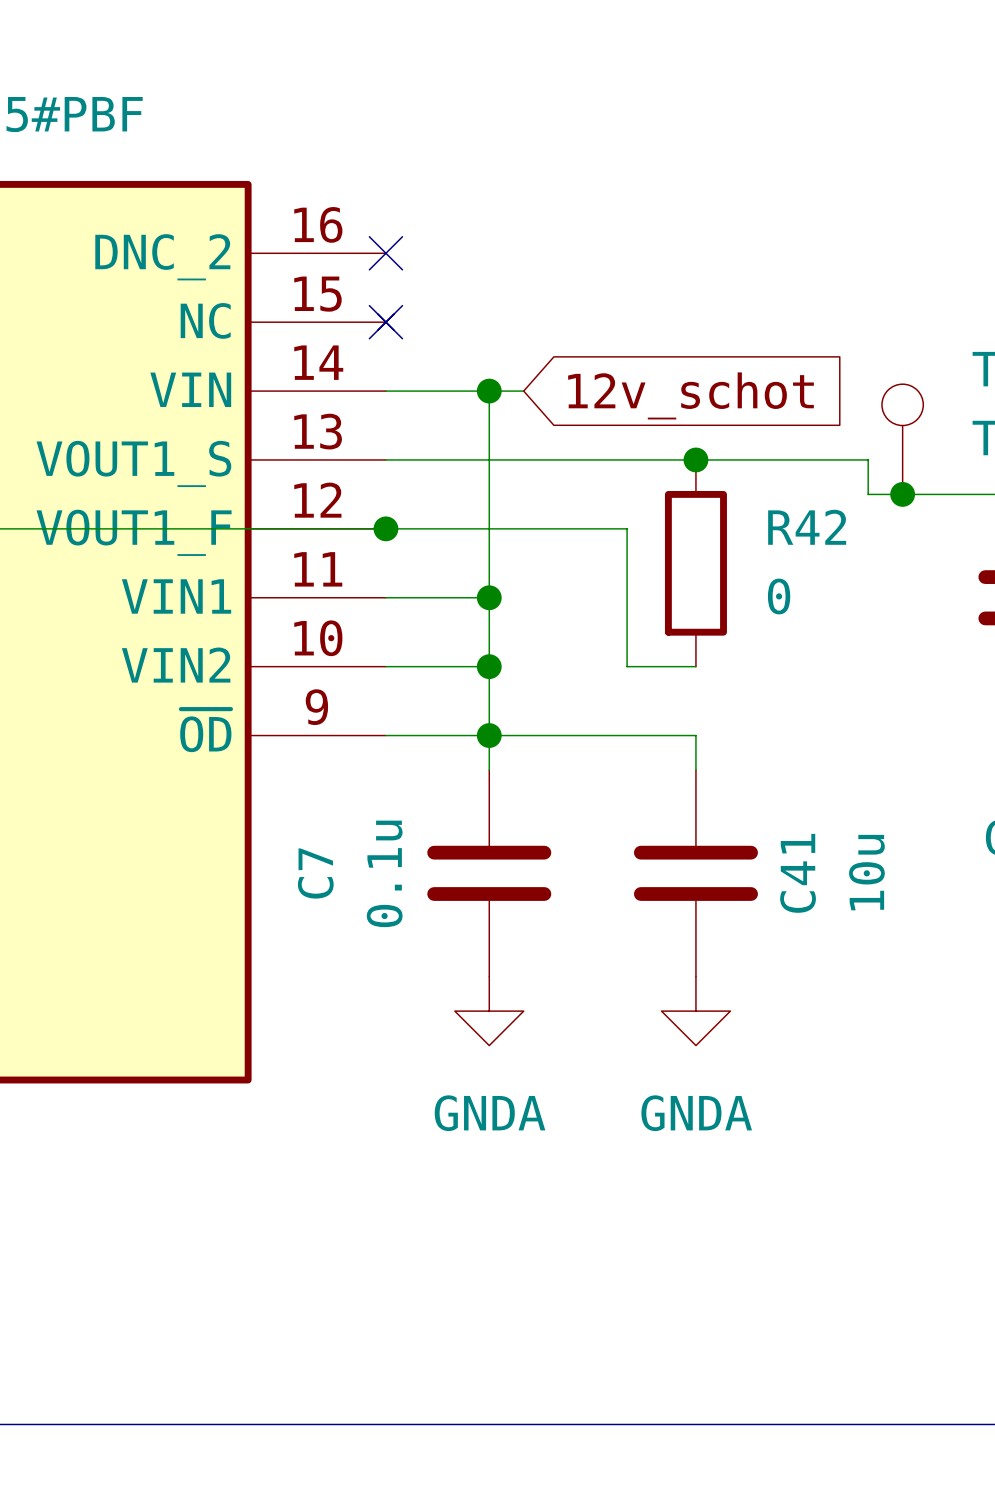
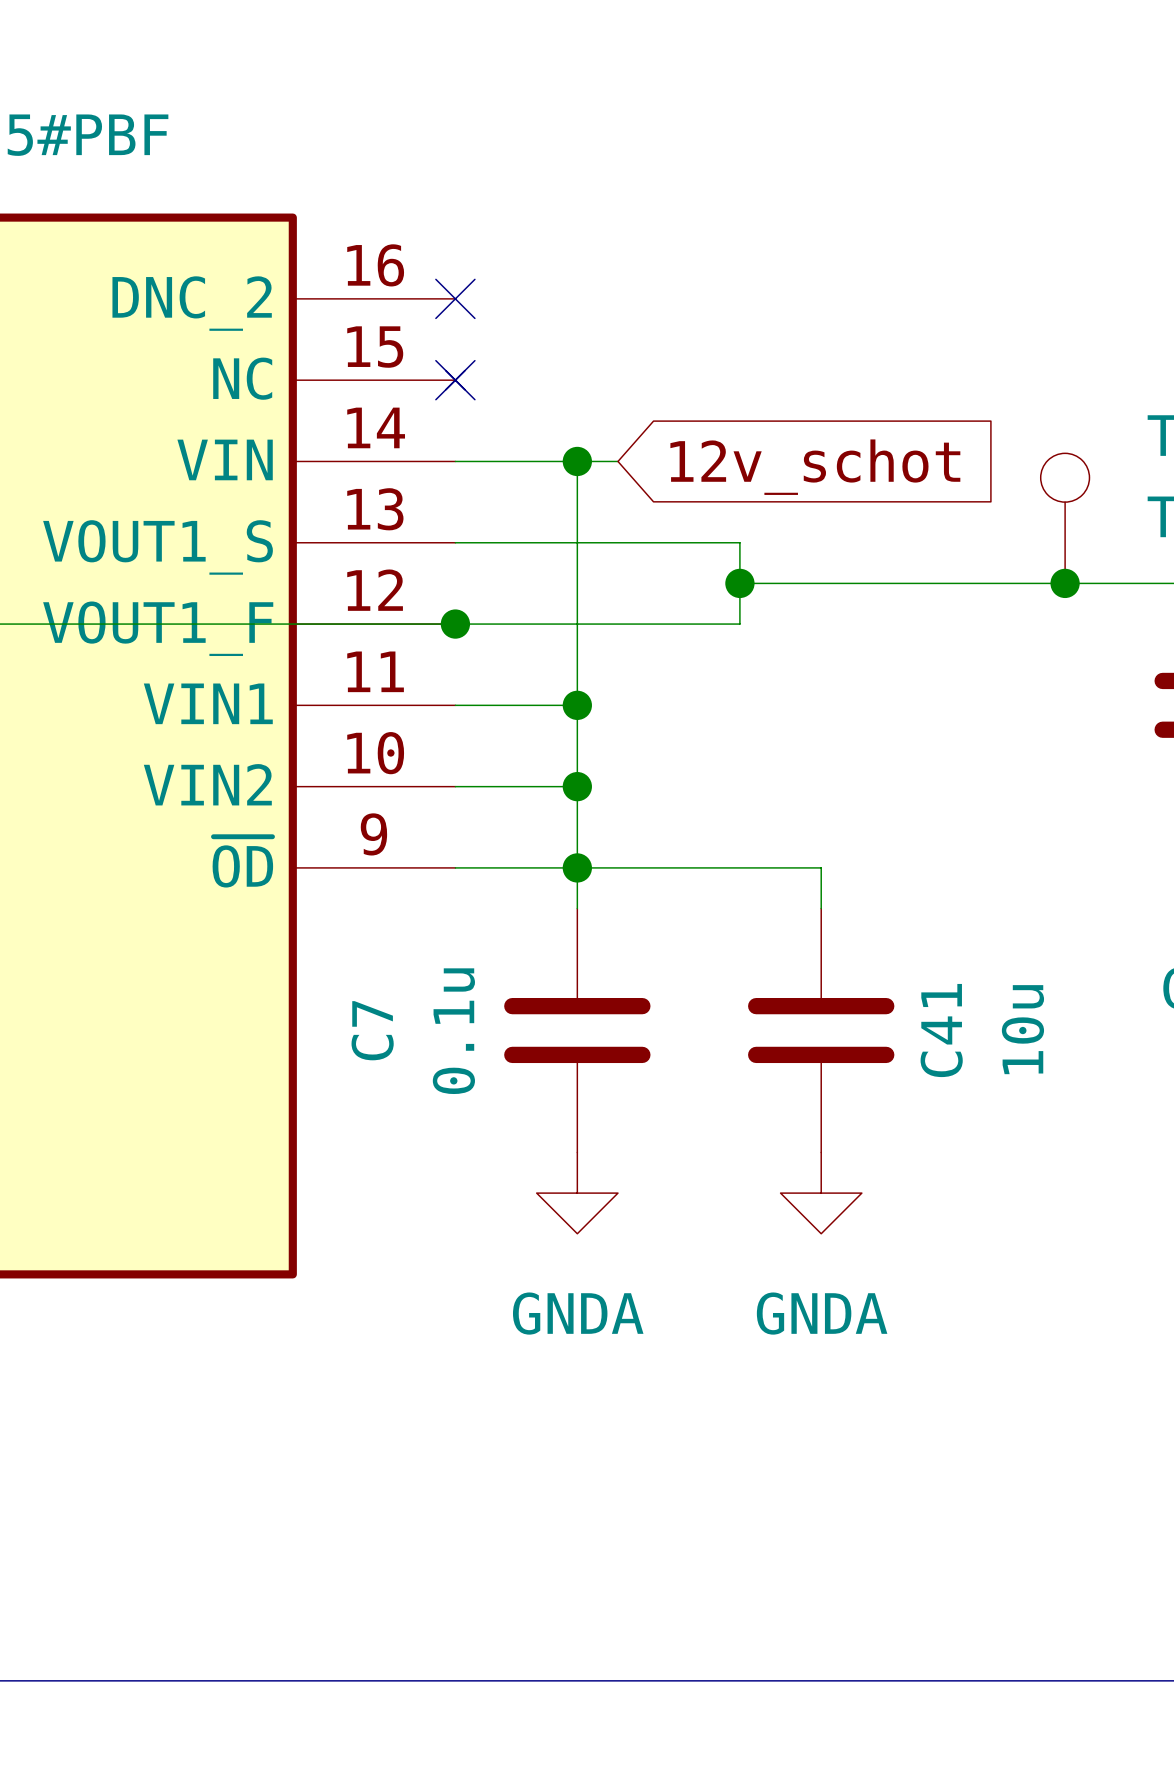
wire: (627, 459) (868, 459) (868, 494) -> (739, 583) (1024, 583)
junction position: (695, 459) -> (739, 583)
wire: (627, 528) (627, 666) (695, 666) -> (739, 624) (739, 542)
R42: 0 (695, 563) -> none

